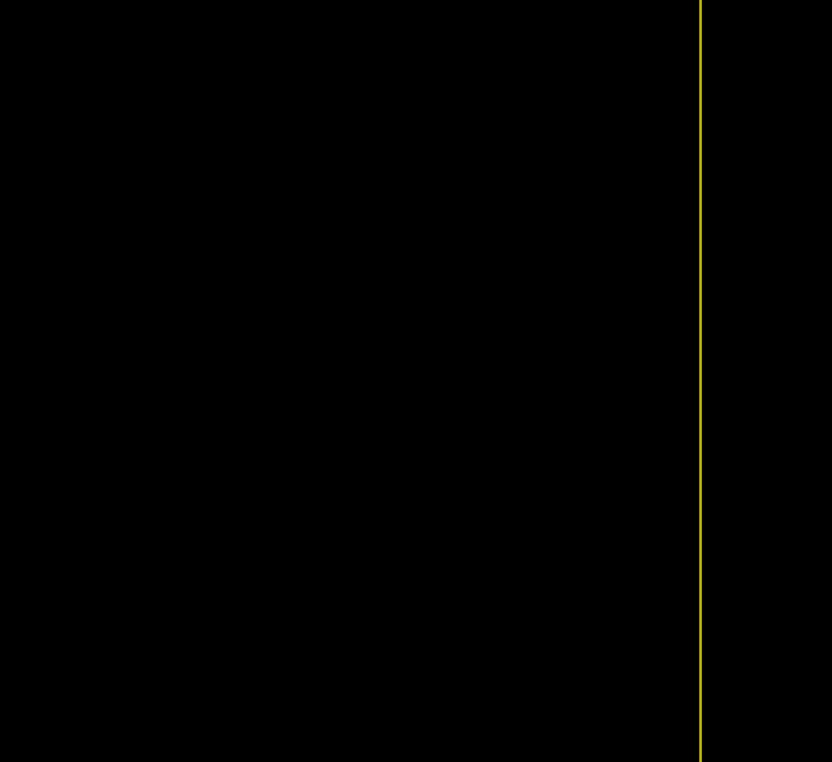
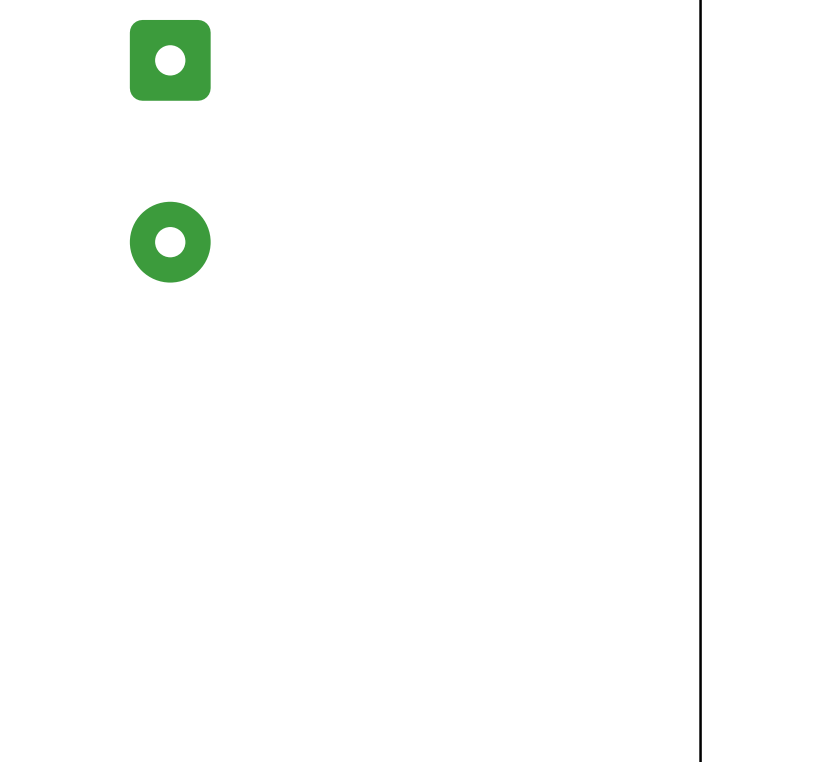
part: none -> (170, 151)

